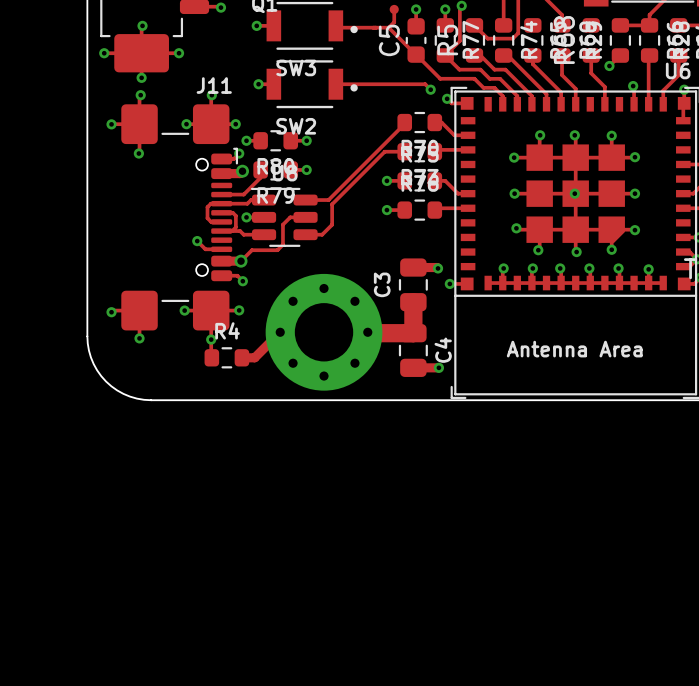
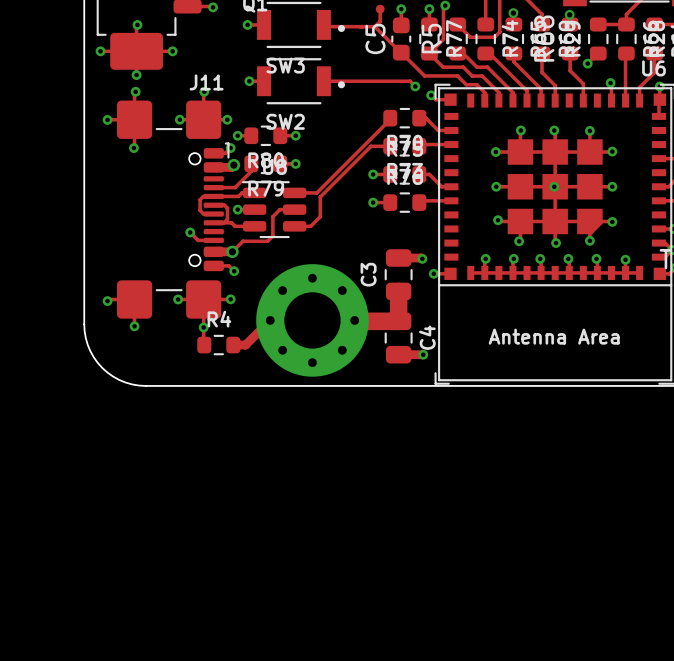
via: none -> (513, 13)
via: none -> (569, 14)

